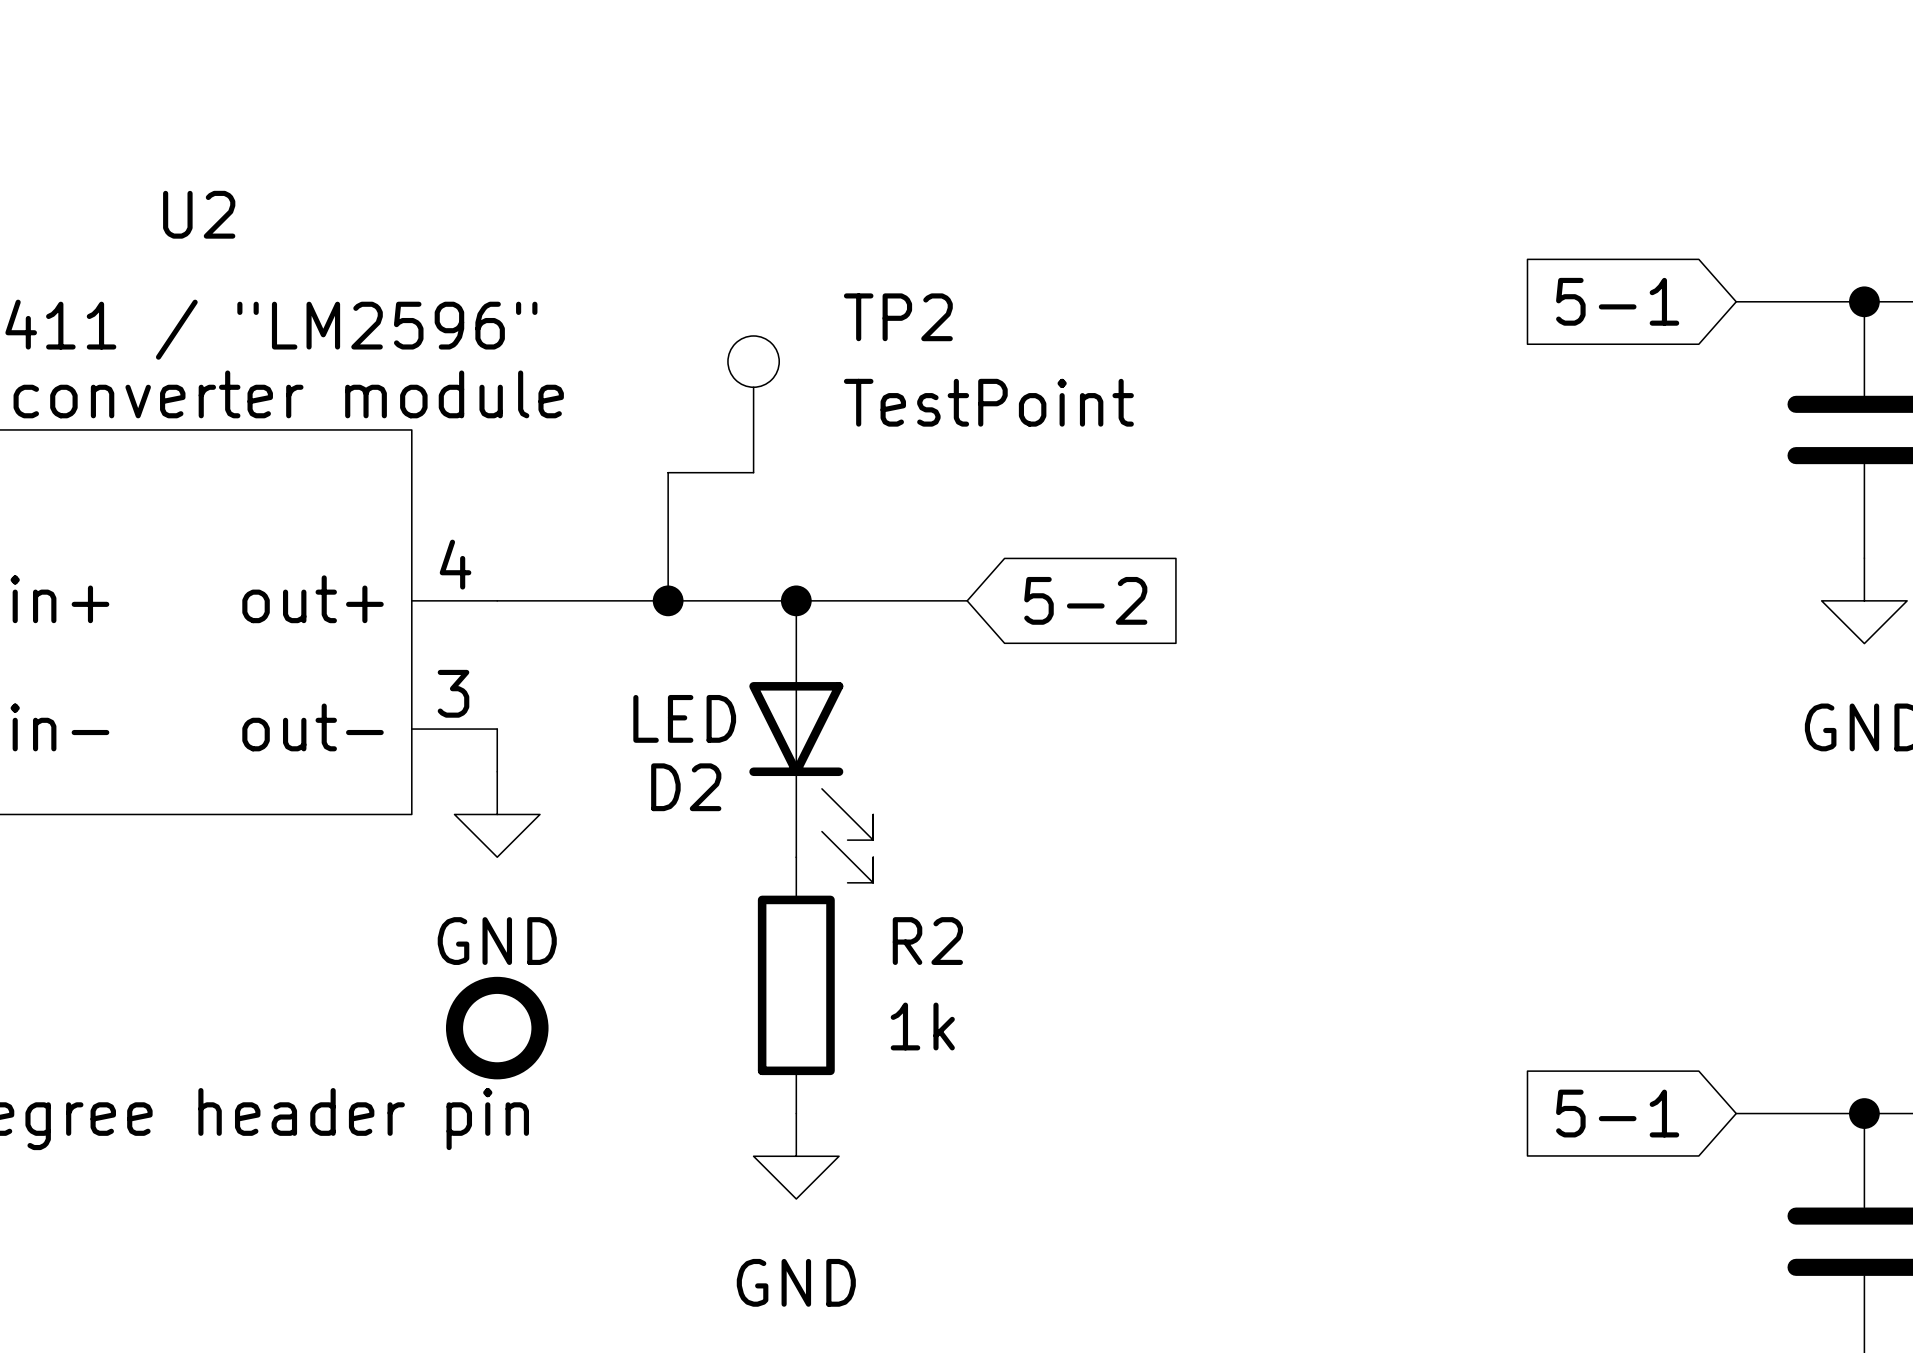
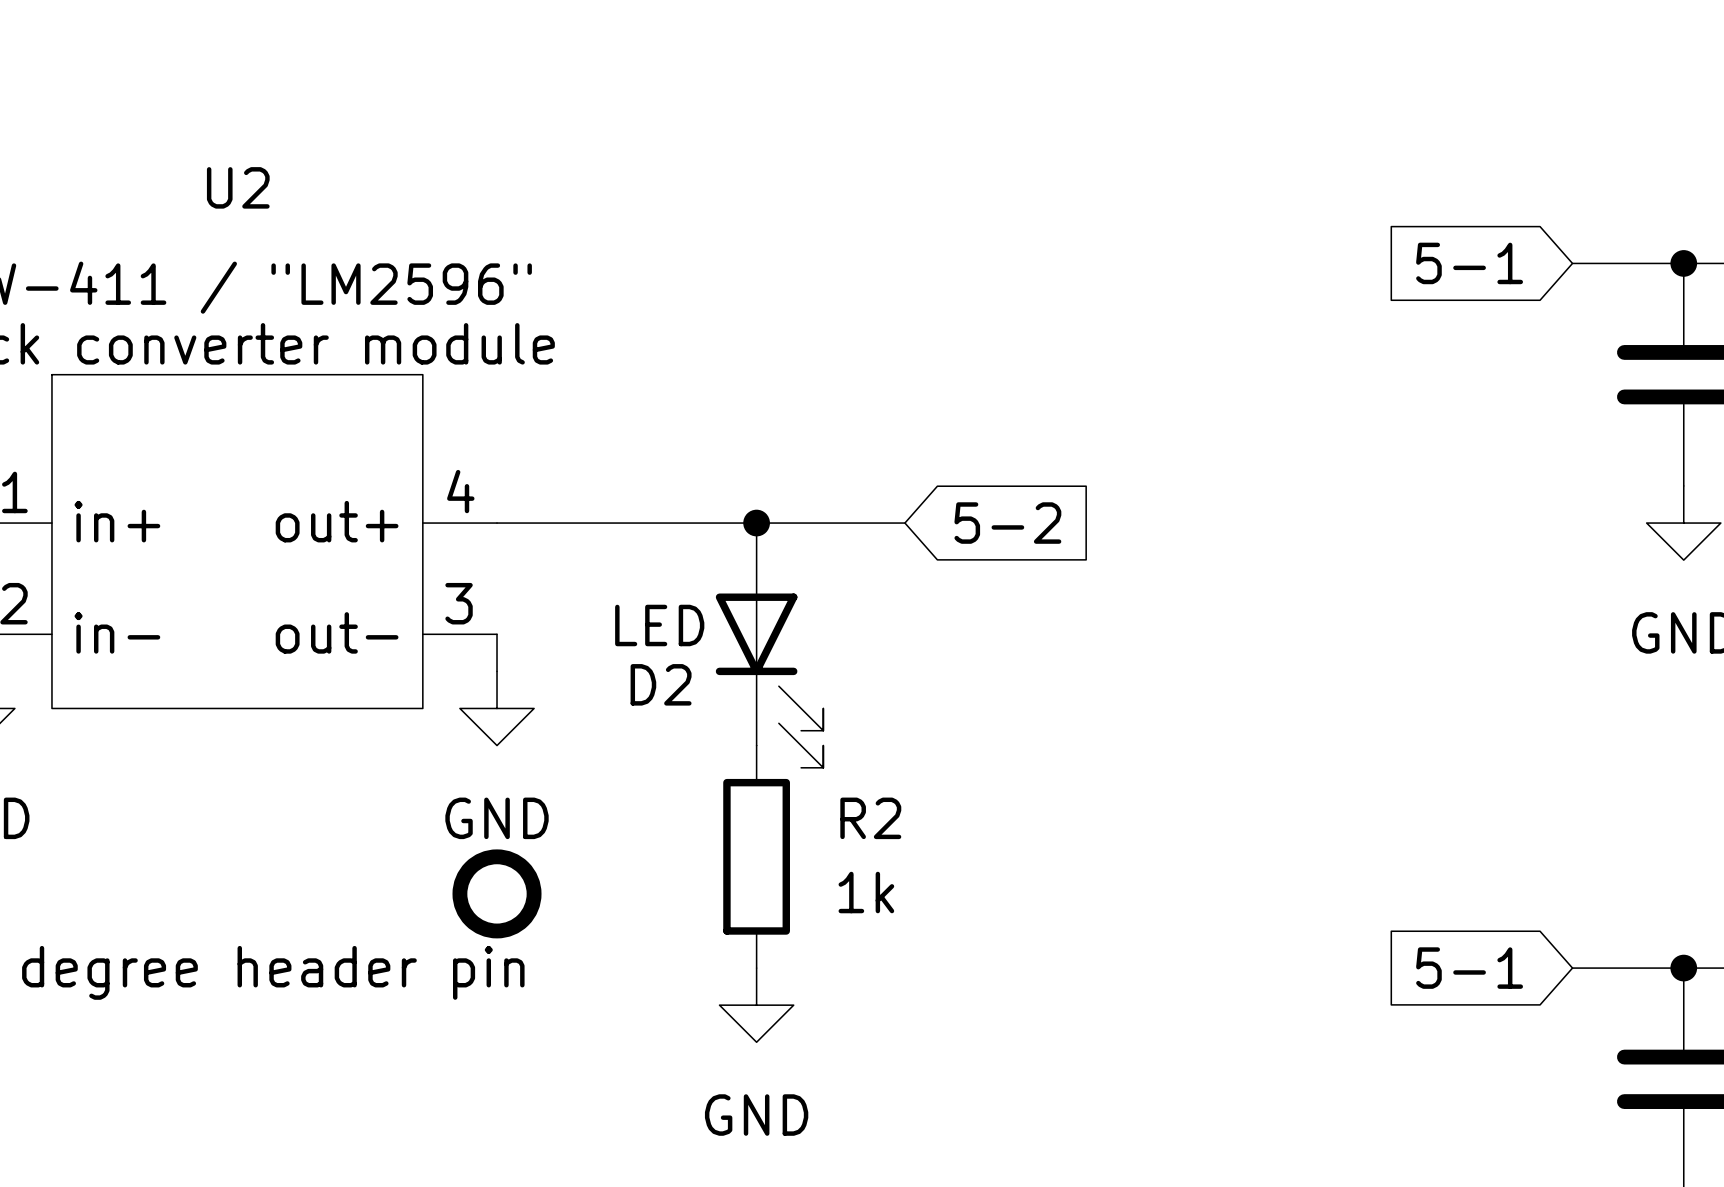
TP2: TestPoint (753, 404) -> none
wire: (753, 472) (668, 472) (668, 600) -> none
junction: (668, 600) -> none

